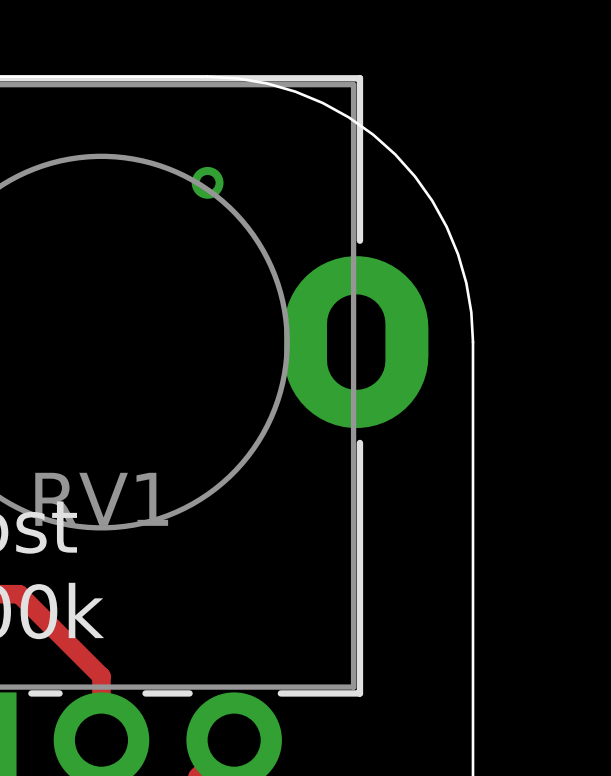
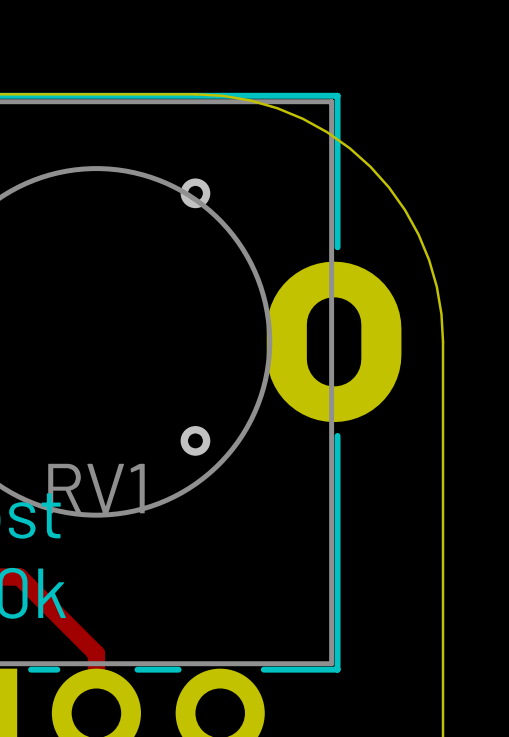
via: none -> (195, 440)

